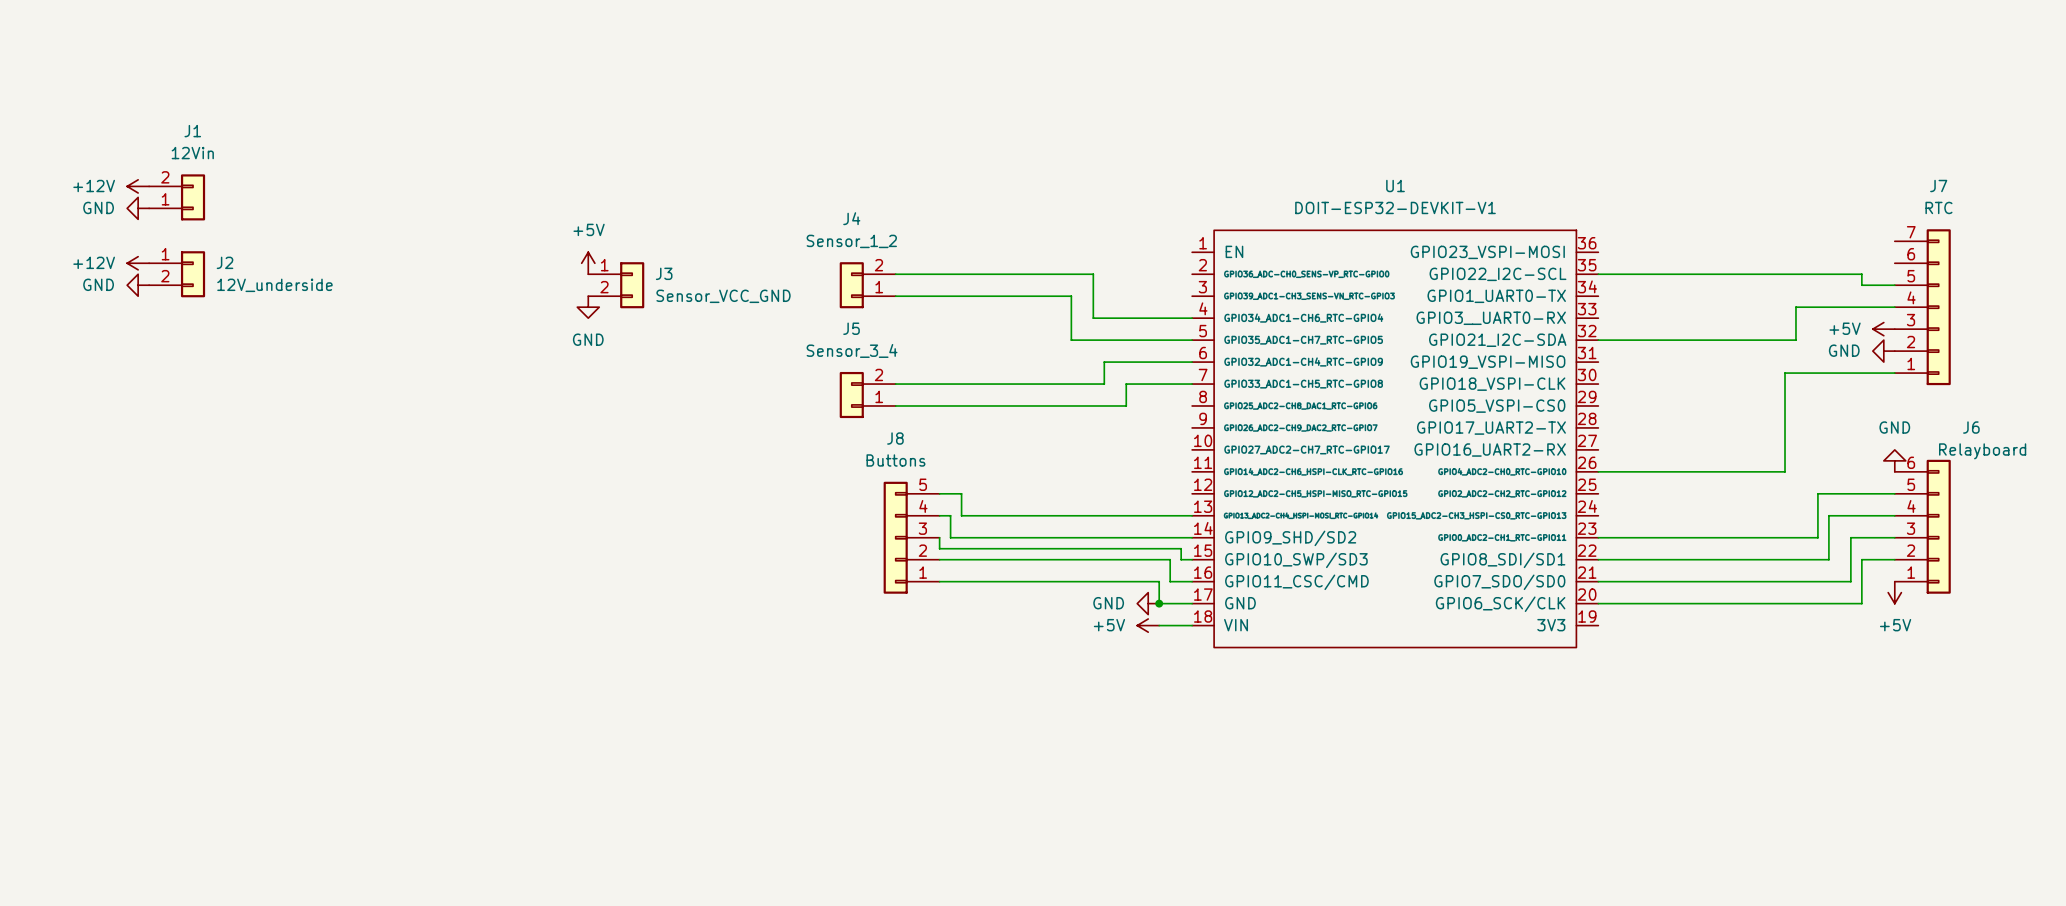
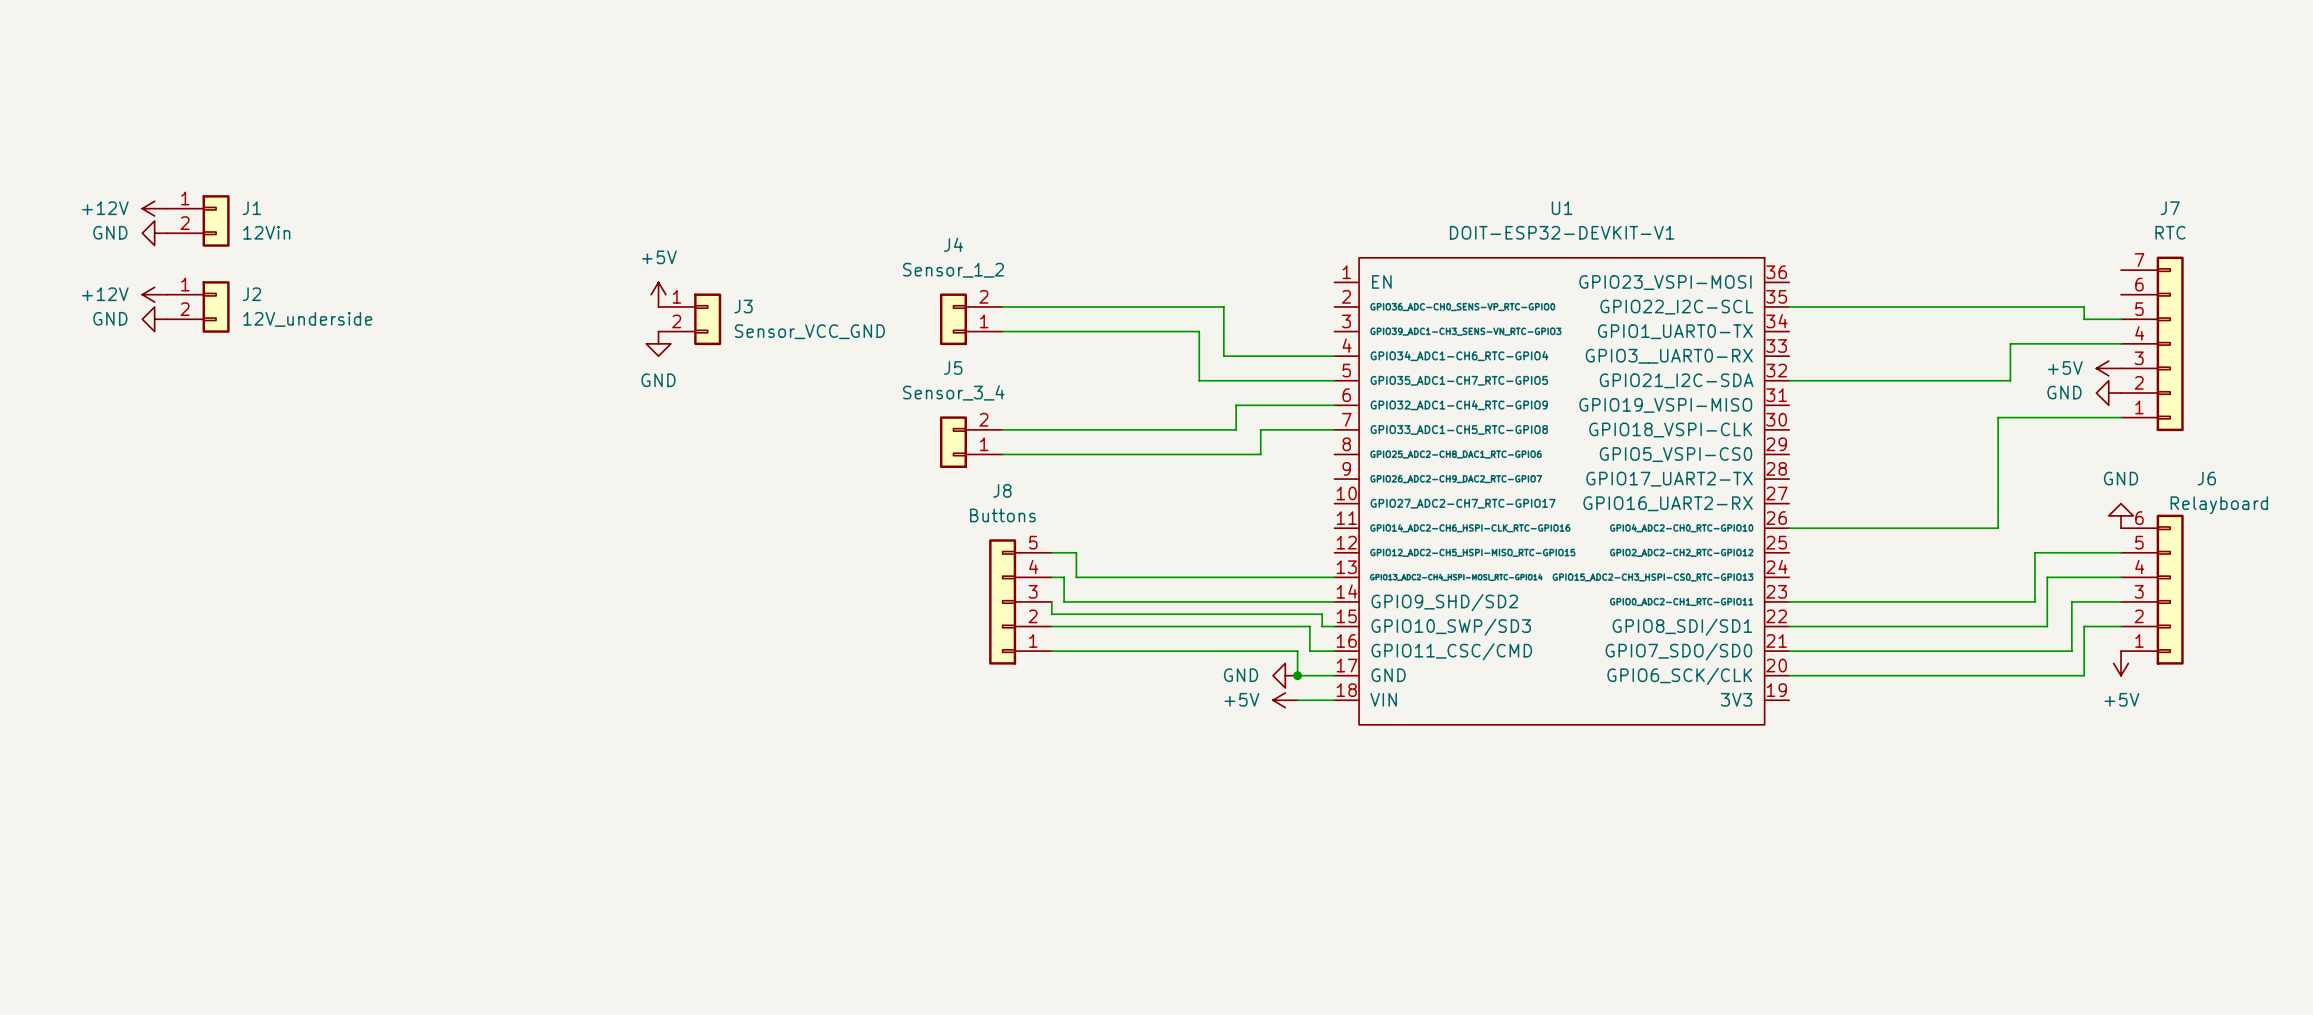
J1 name position: J1 (192, 131) -> J1 (251, 208)
J1 value position: 12Vin (192, 153) -> 12Vin (266, 232)
J1 flip: as is (193, 197) -> up-down (216, 220)

